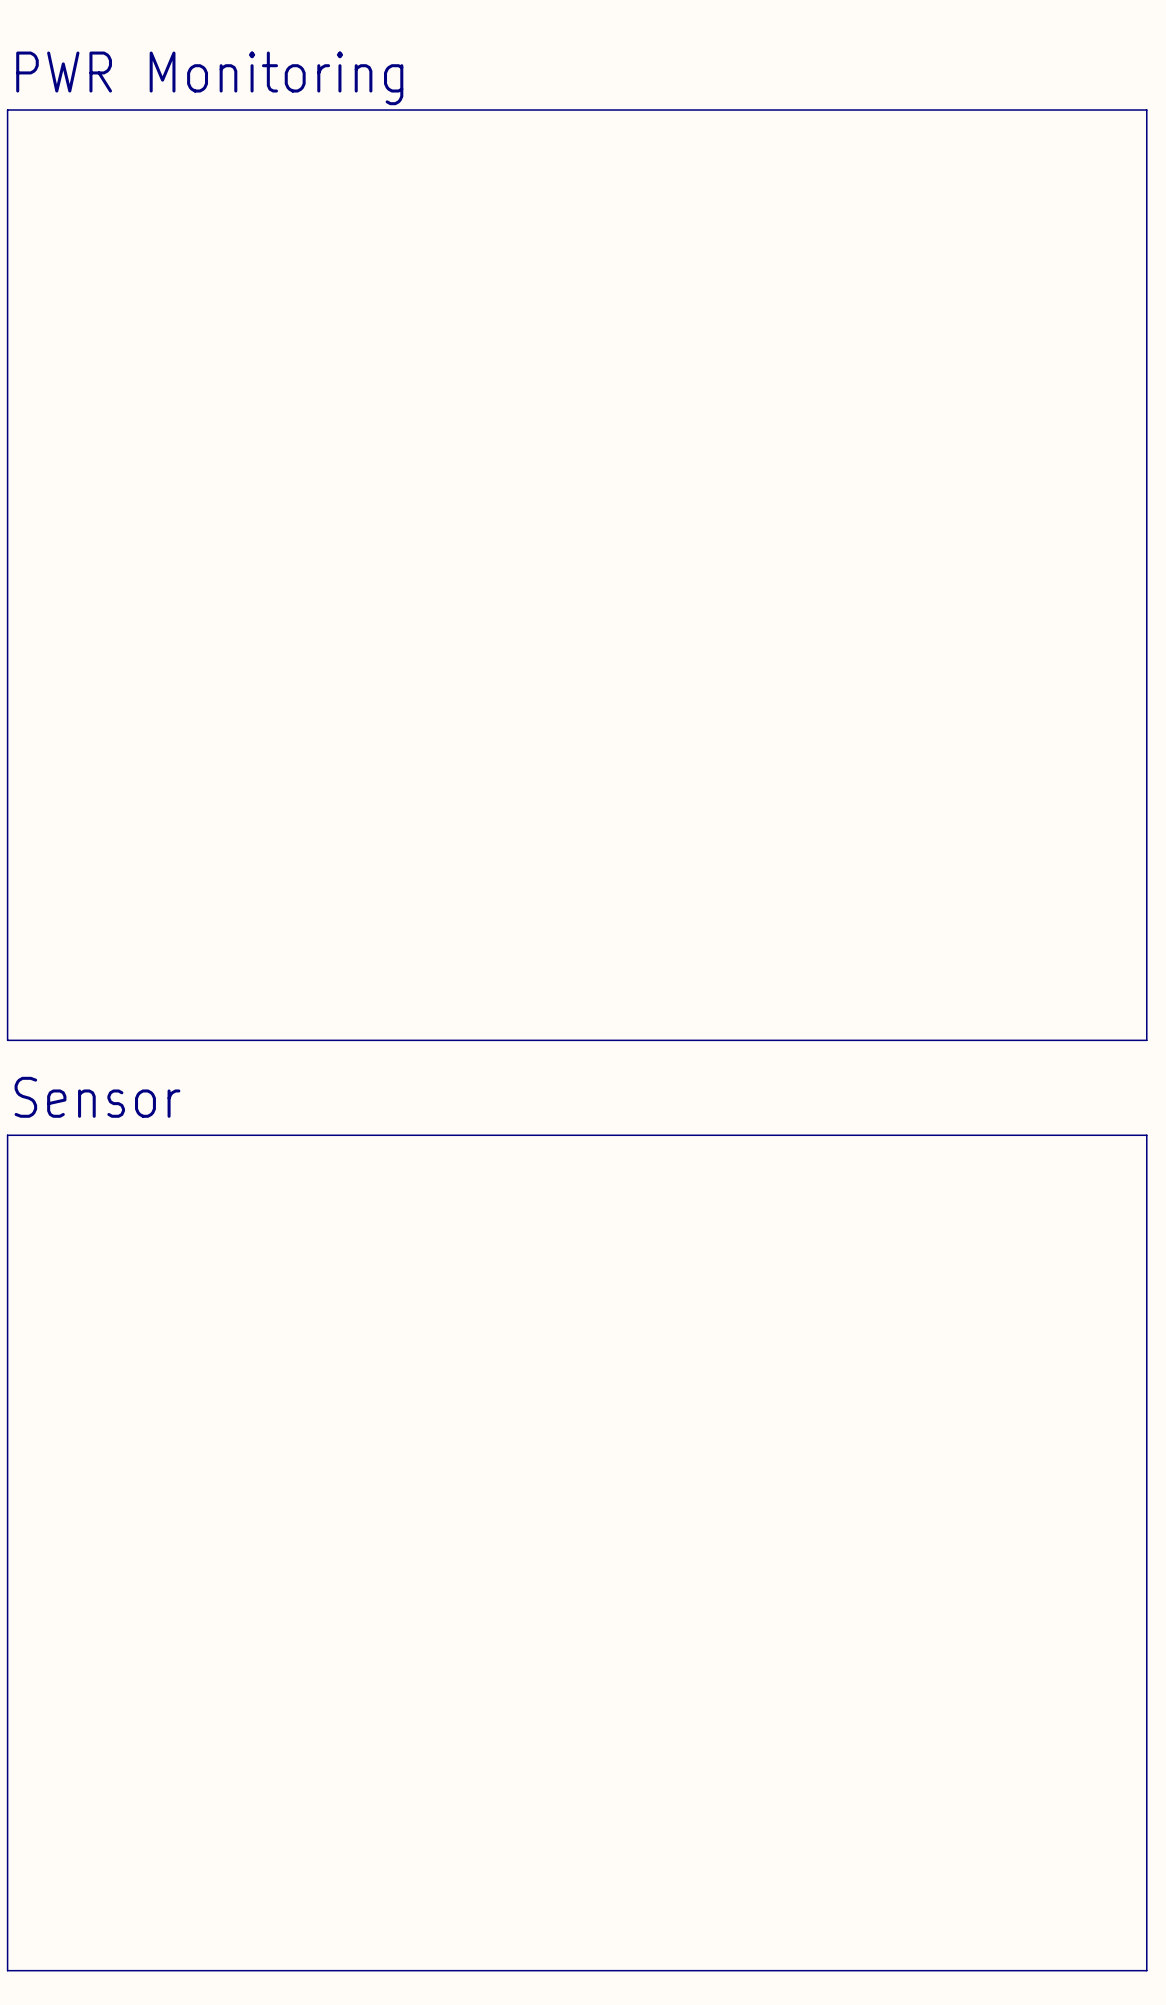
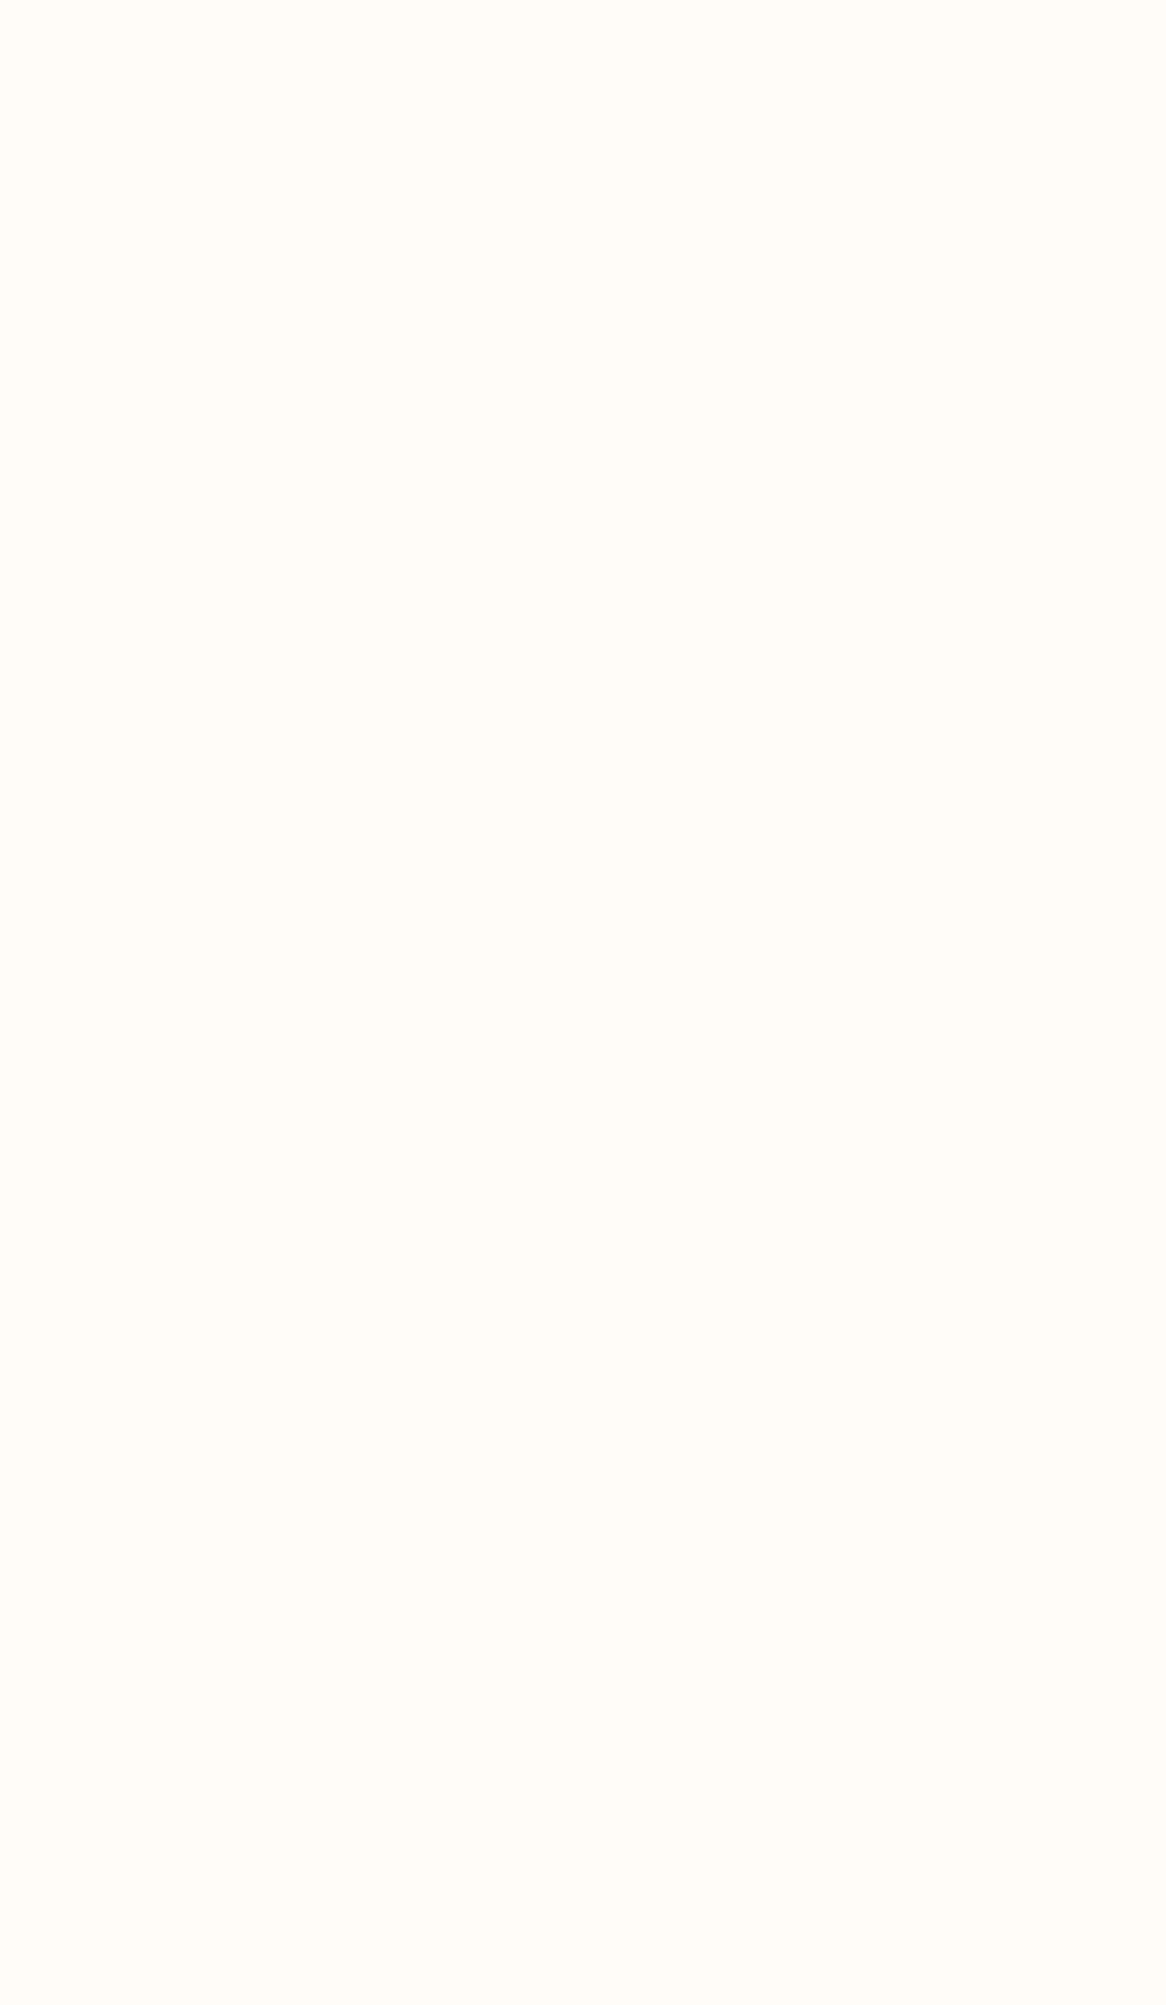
text: PWR Monitoring (209, 78) -> none
line: (7, 110) (7, 1040) (1146, 1040) (1146, 110) (7, 110) -> none
text: Sensor (97, 1097) -> none
line: (7, 1135) (7, 1970) (1146, 1970) (1146, 1135) (7, 1135) -> none

